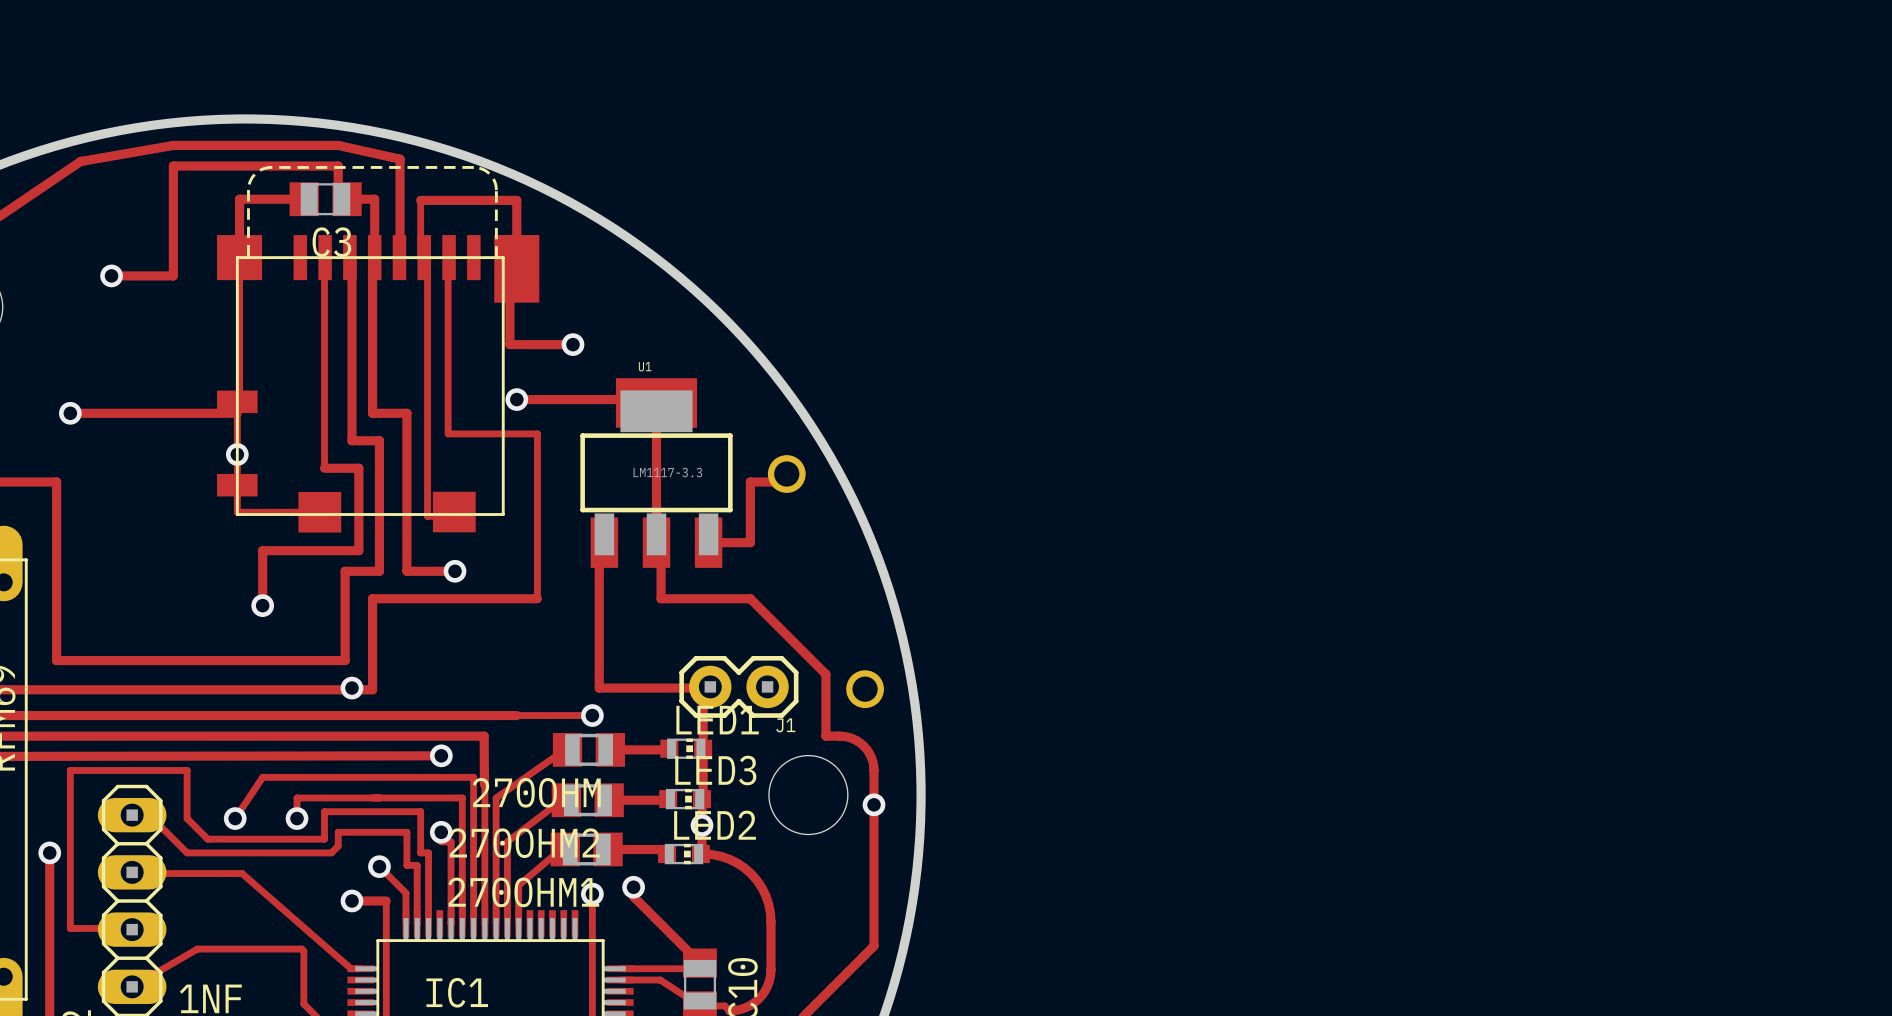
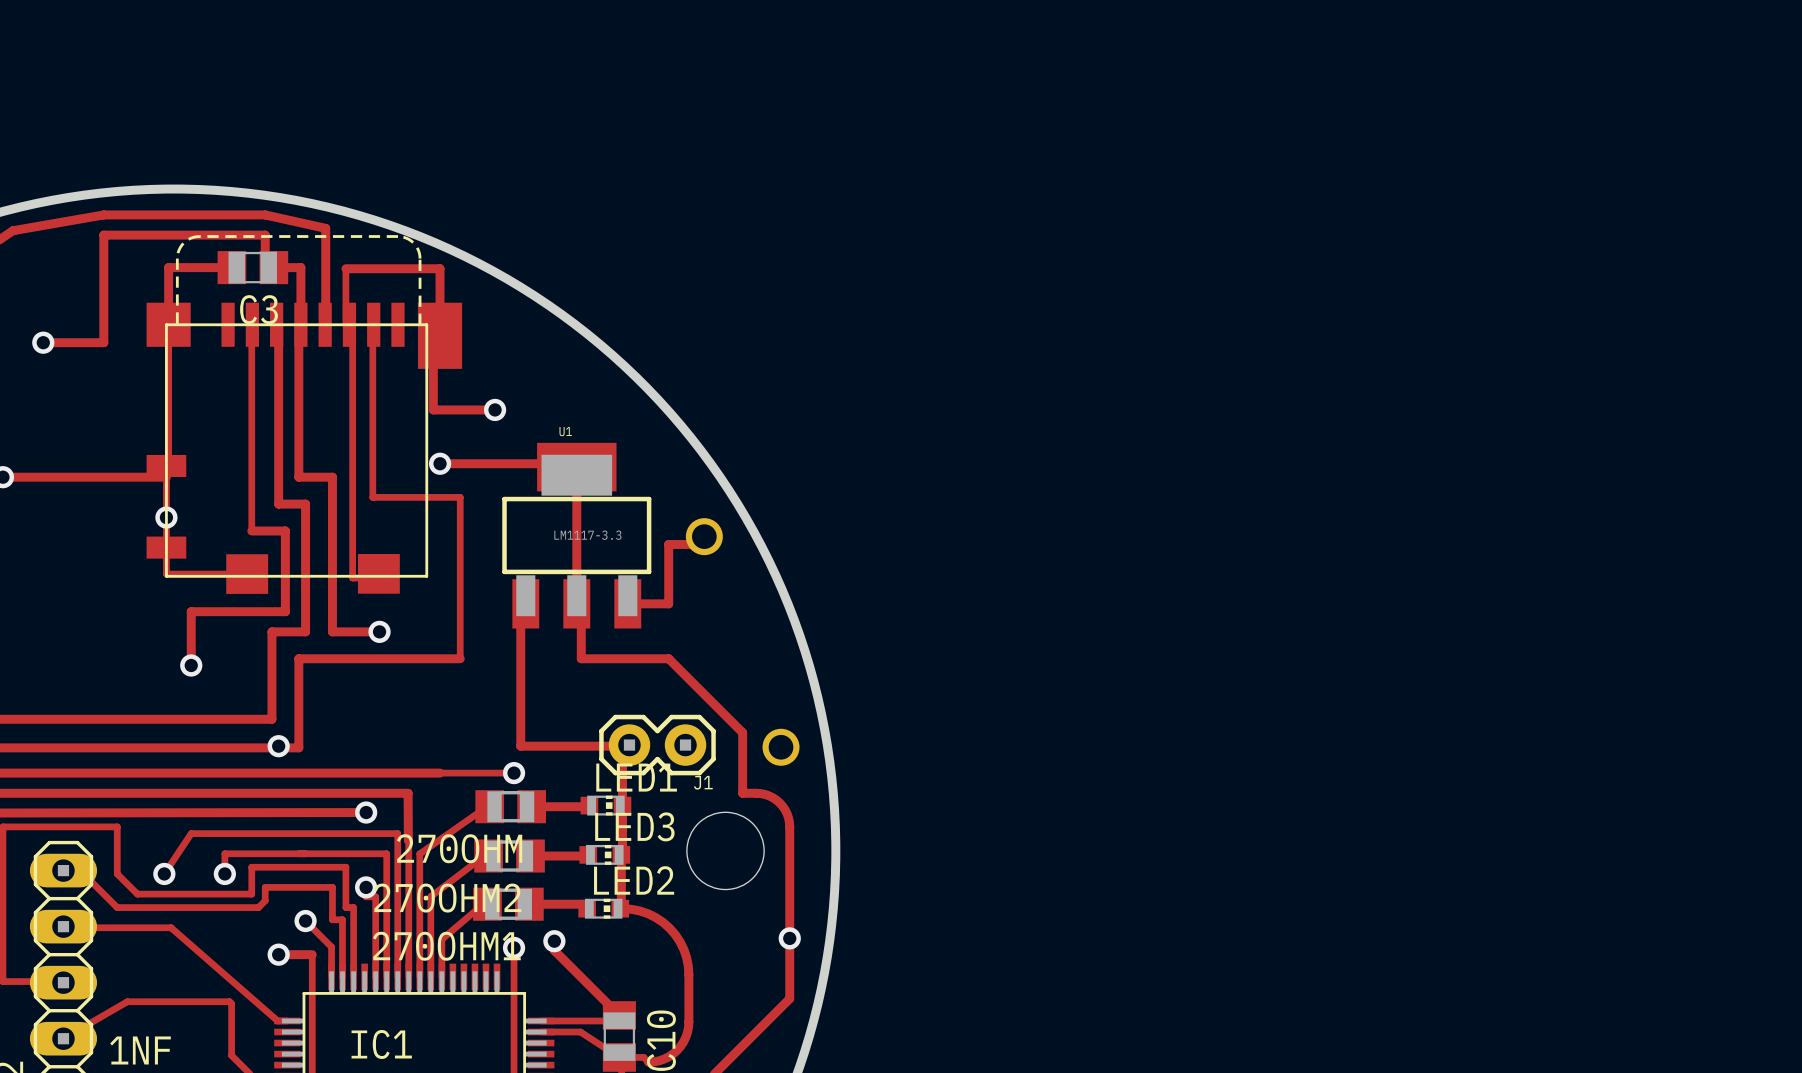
via position: (874, 804) -> (789, 938)
via: (702, 825) -> none

